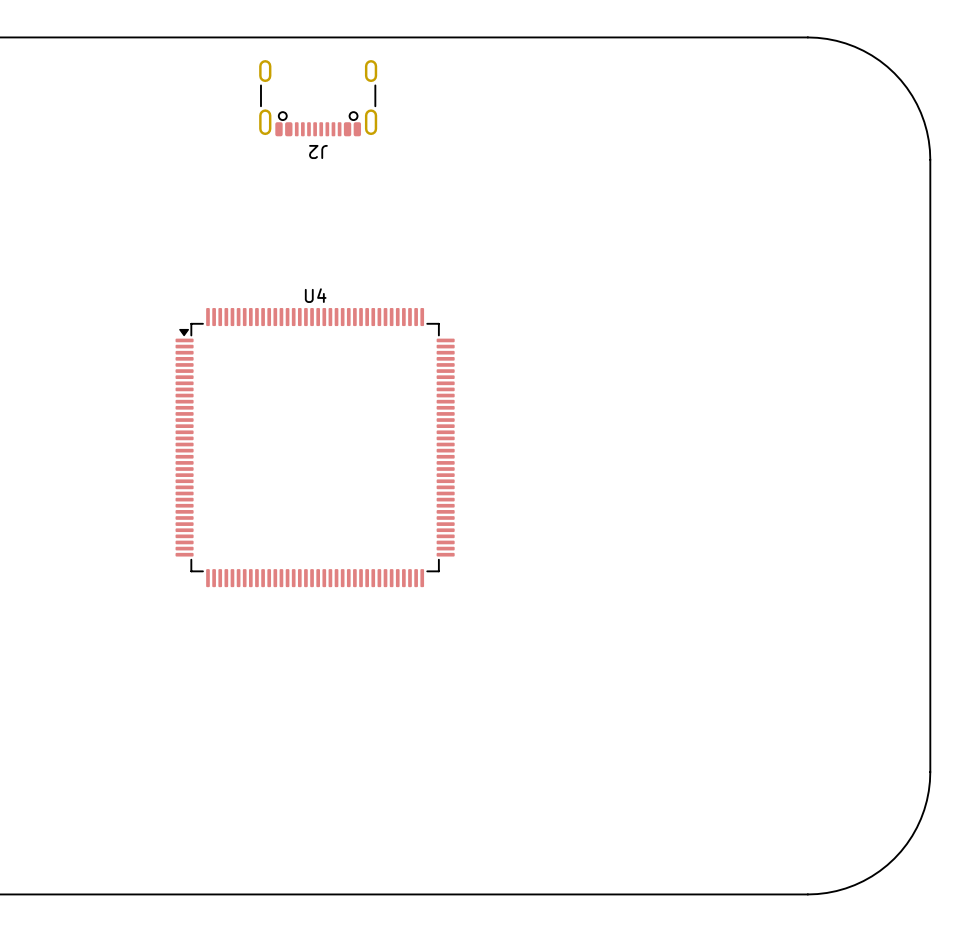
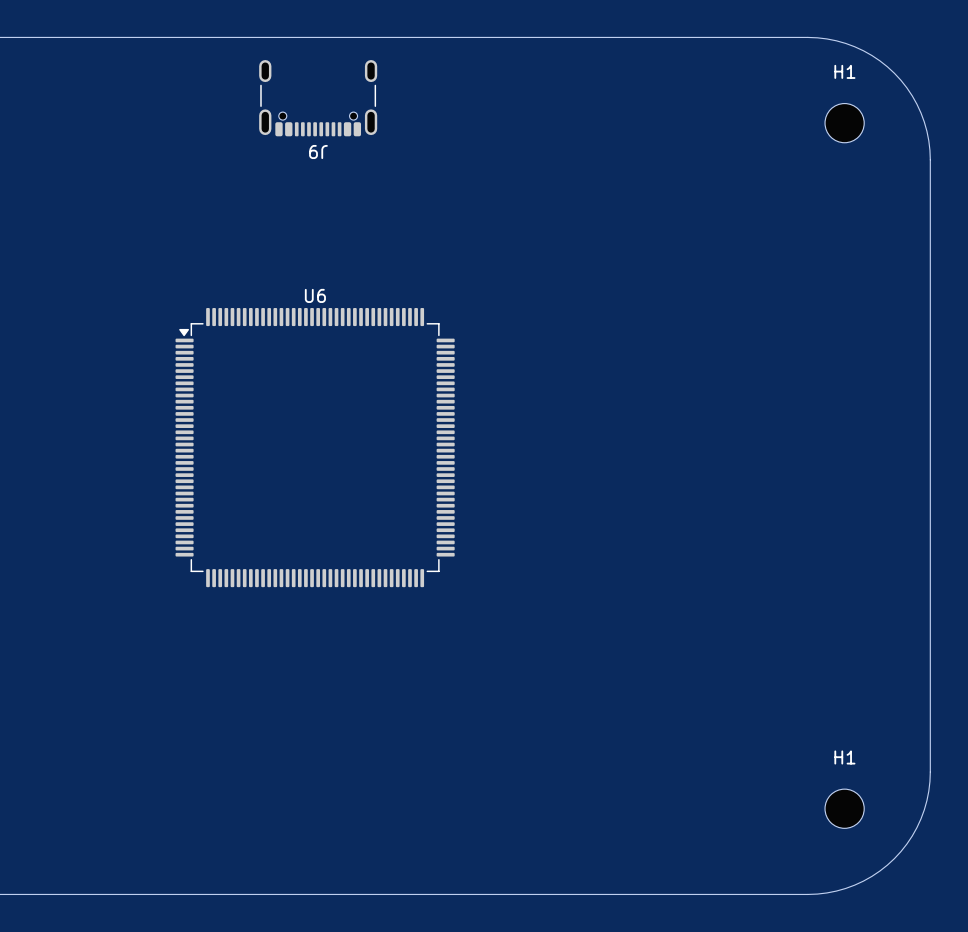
H1: none -> (844, 123)
J2 name: J2 (318, 152) -> J9 (318, 152)
U4 name: U4 (315, 295) -> U6 (315, 295)
H1: none -> (844, 808)

